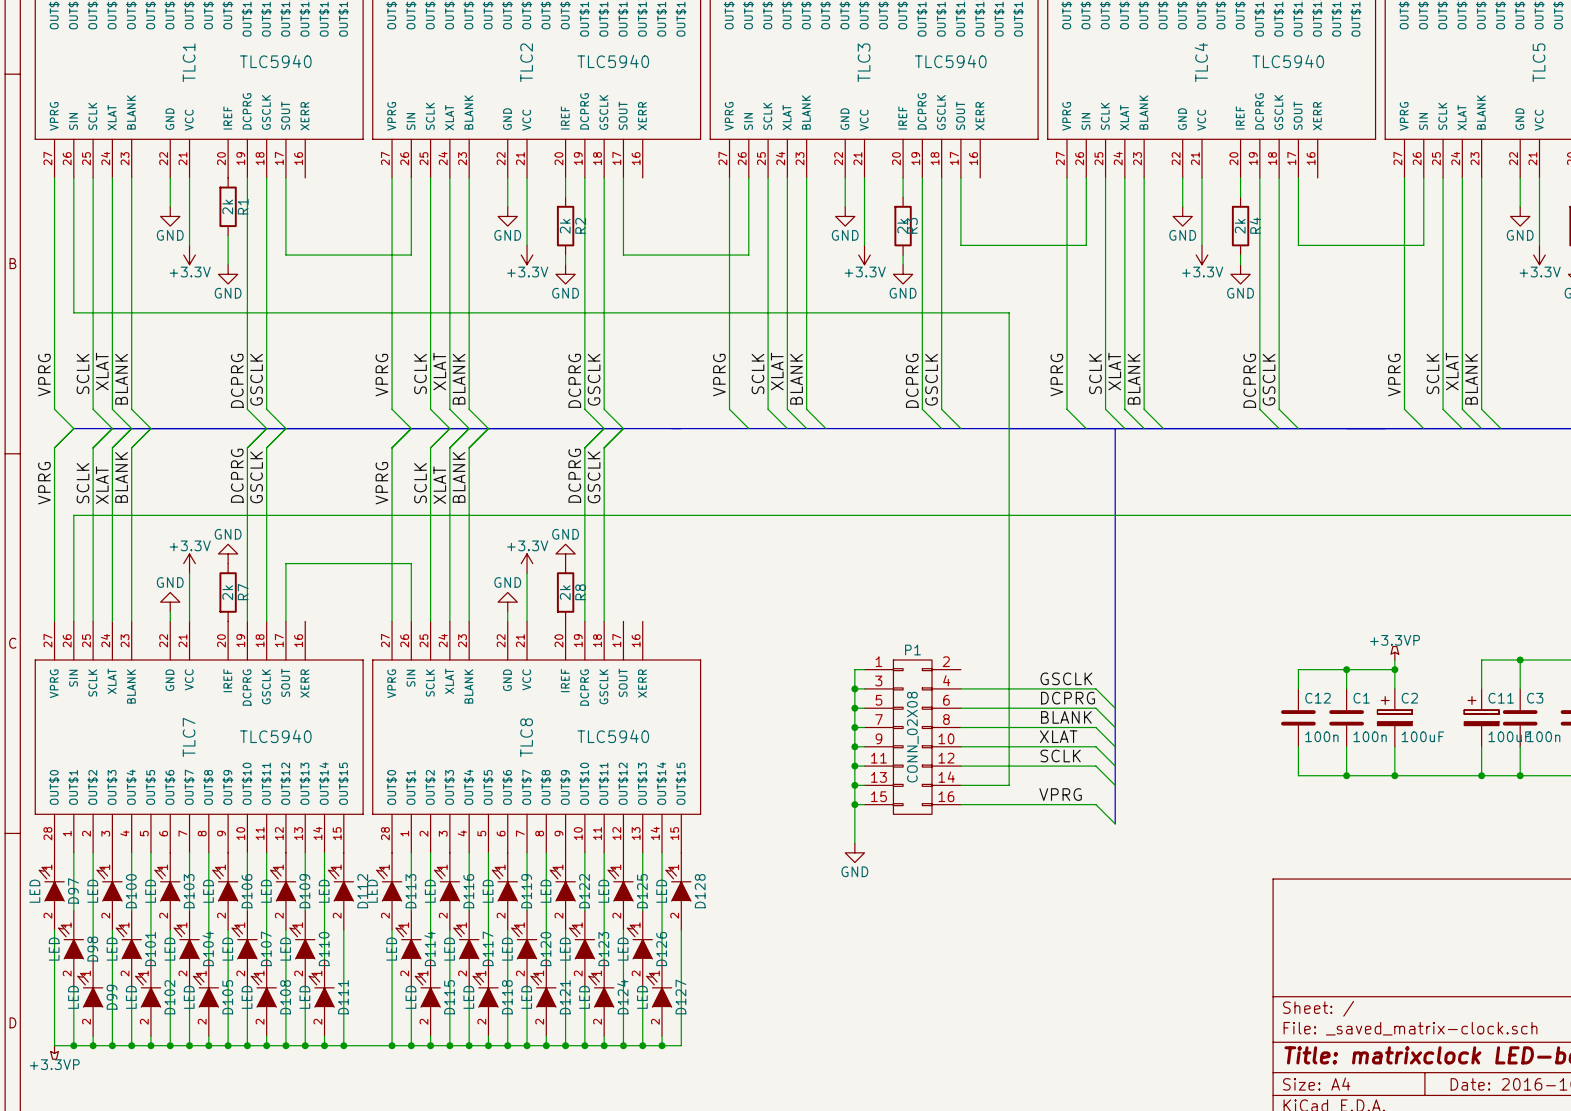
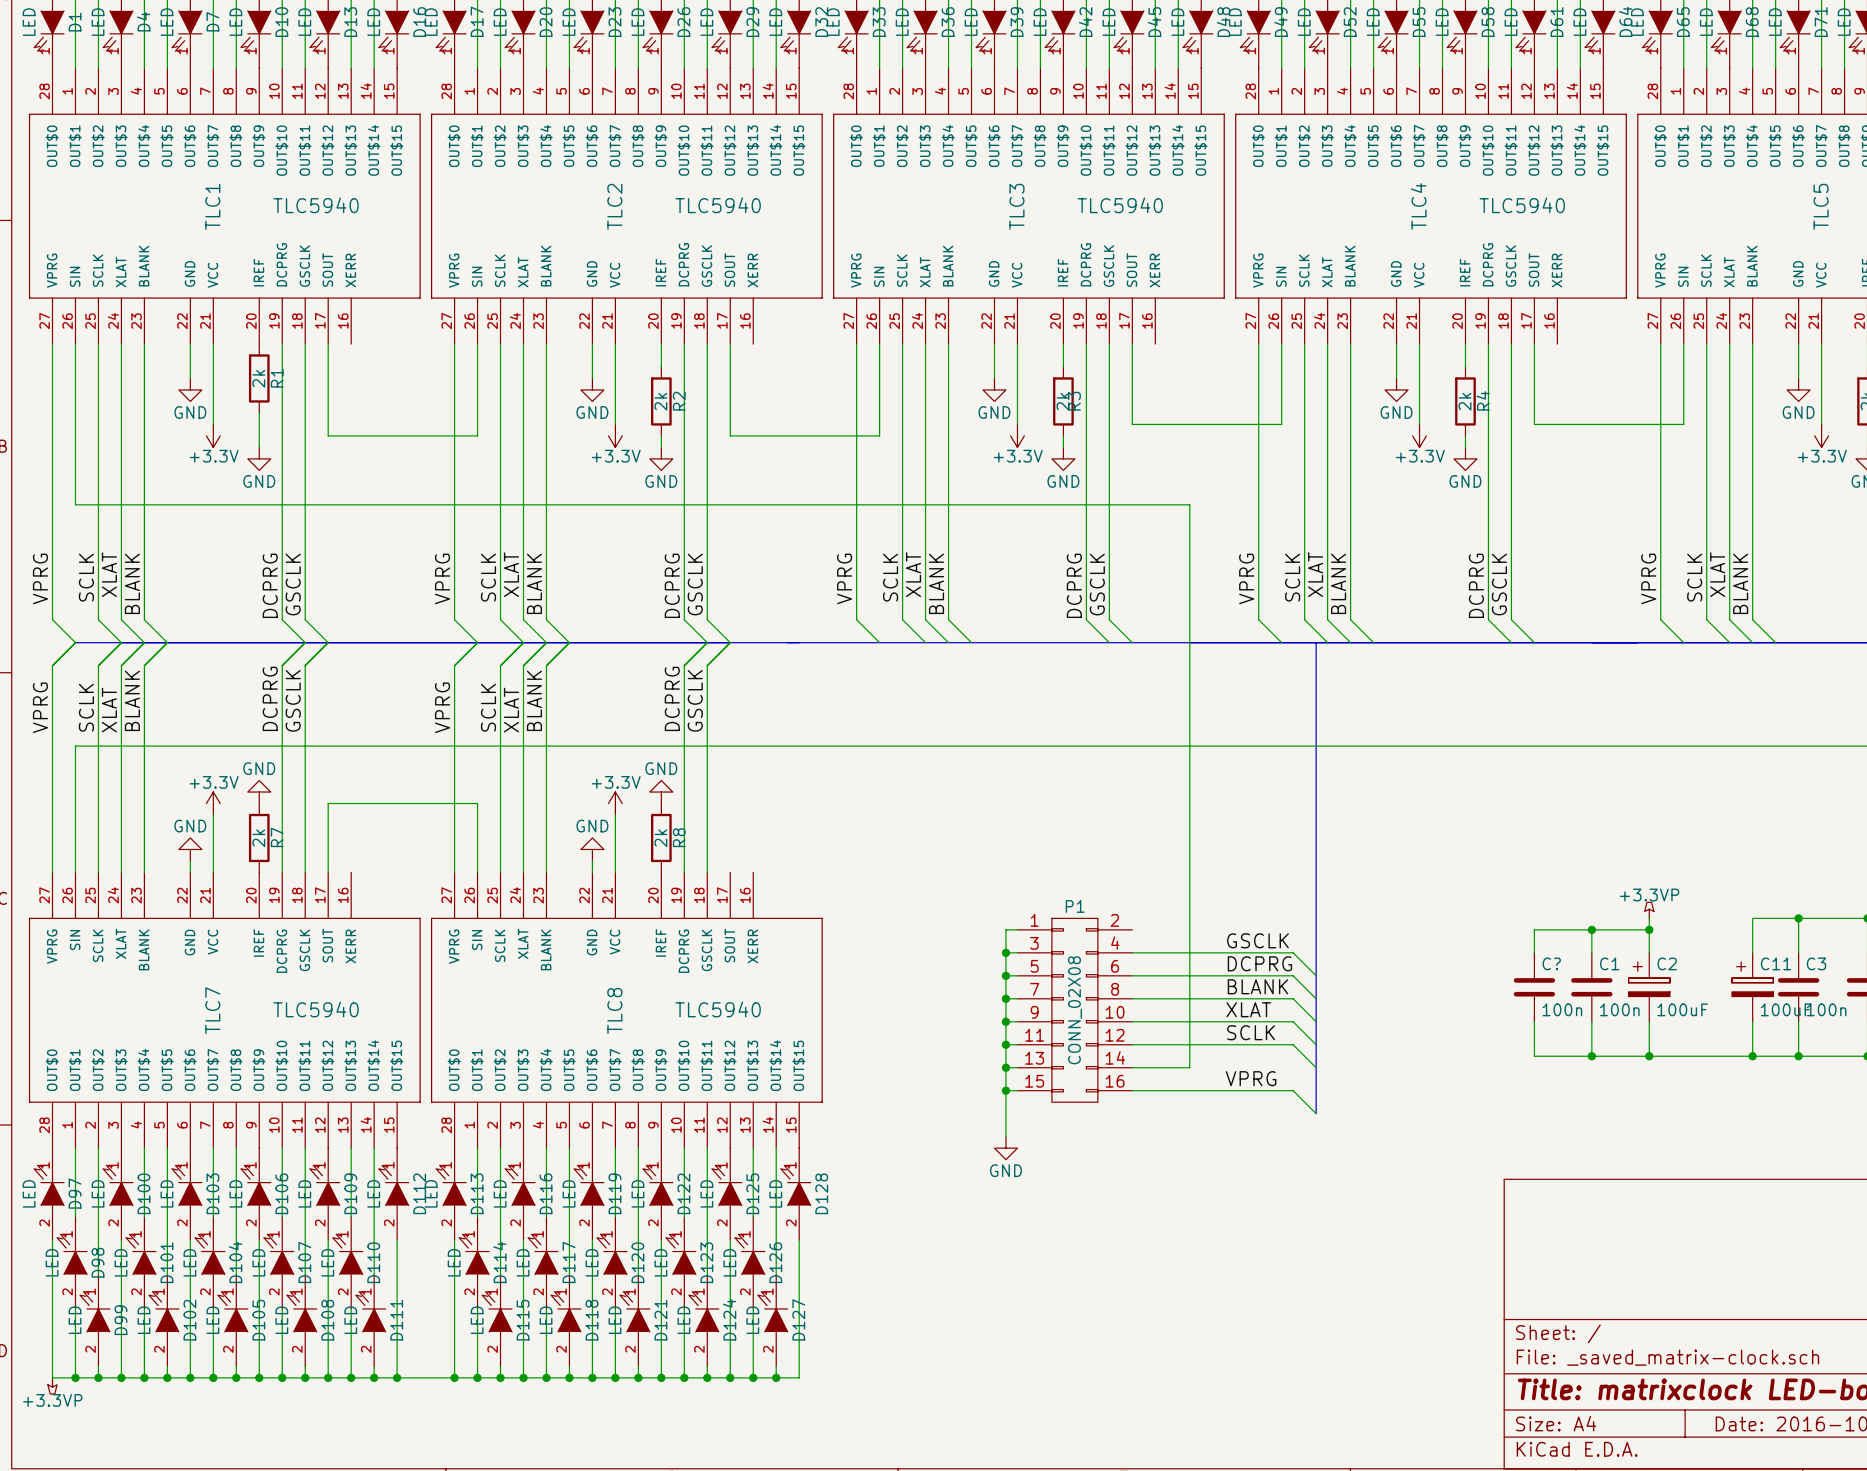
C12 name: C12 (1318, 698) -> C? (1551, 963)

